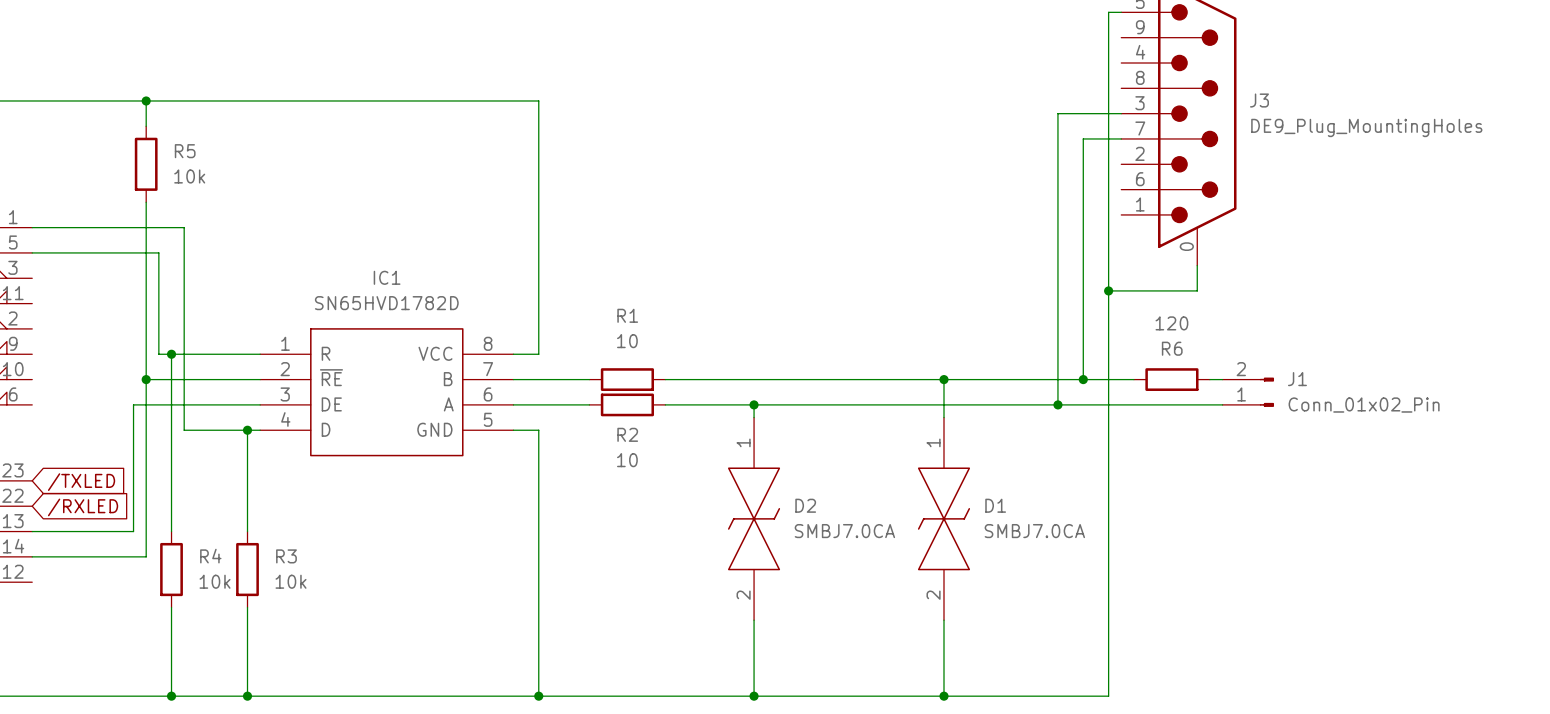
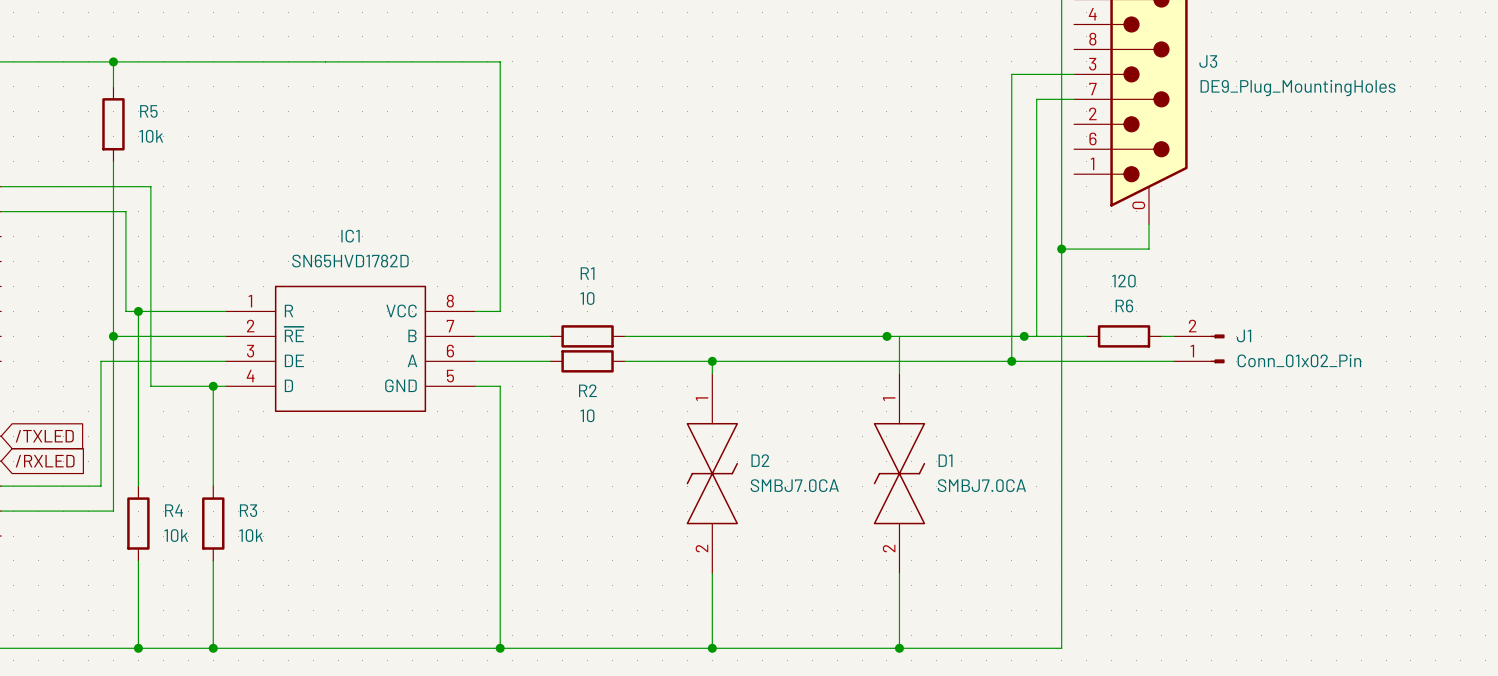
junction position: (943, 379) -> (886, 336)
junction position: (1083, 379) -> (1024, 336)

